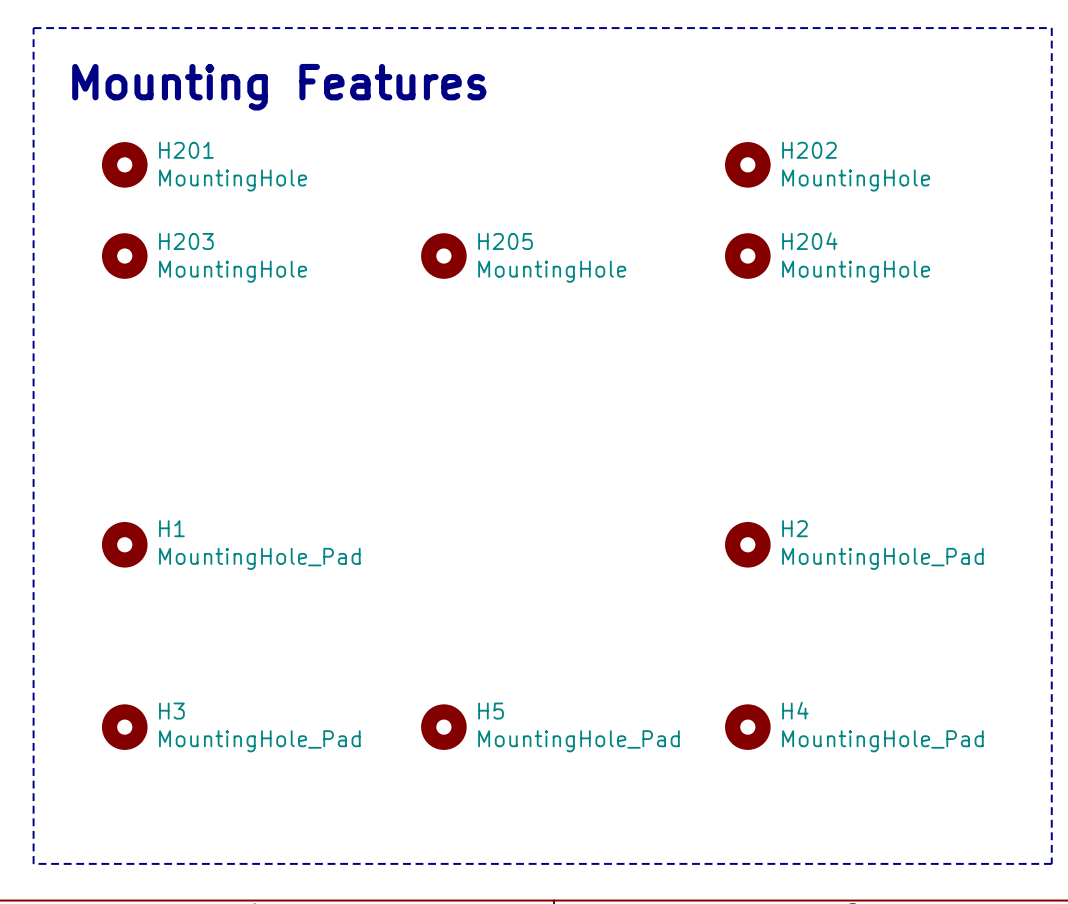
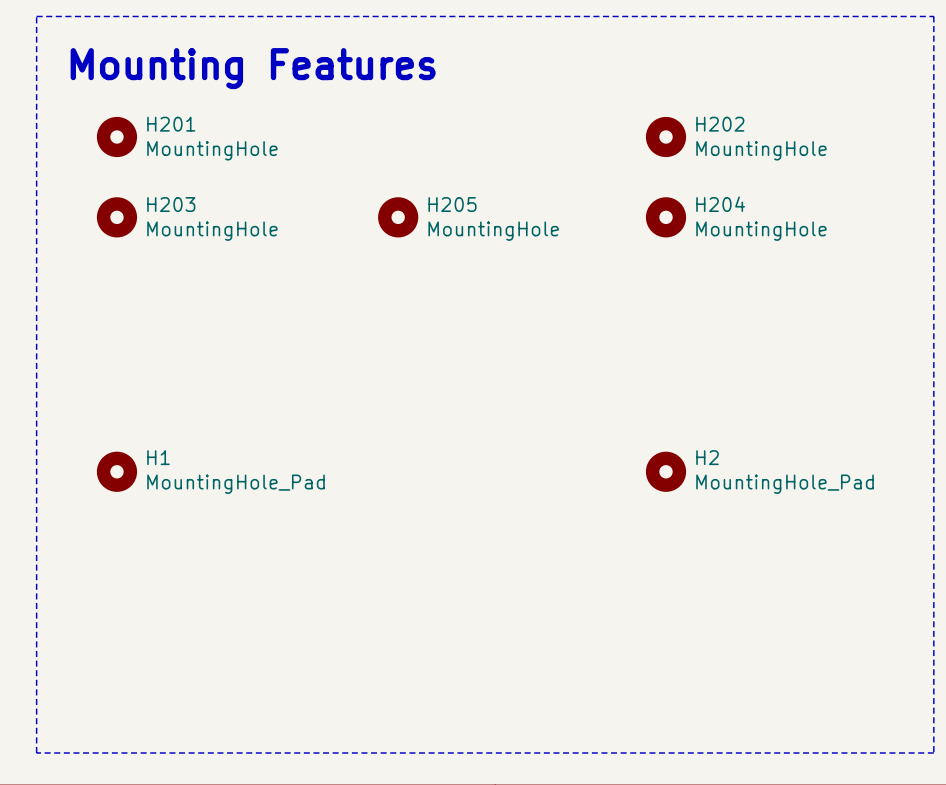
H3: MountingHole_Pad (124, 727) -> none
H5: MountingHole_Pad (443, 727) -> none
H4: MountingHole_Pad (747, 727) -> none

